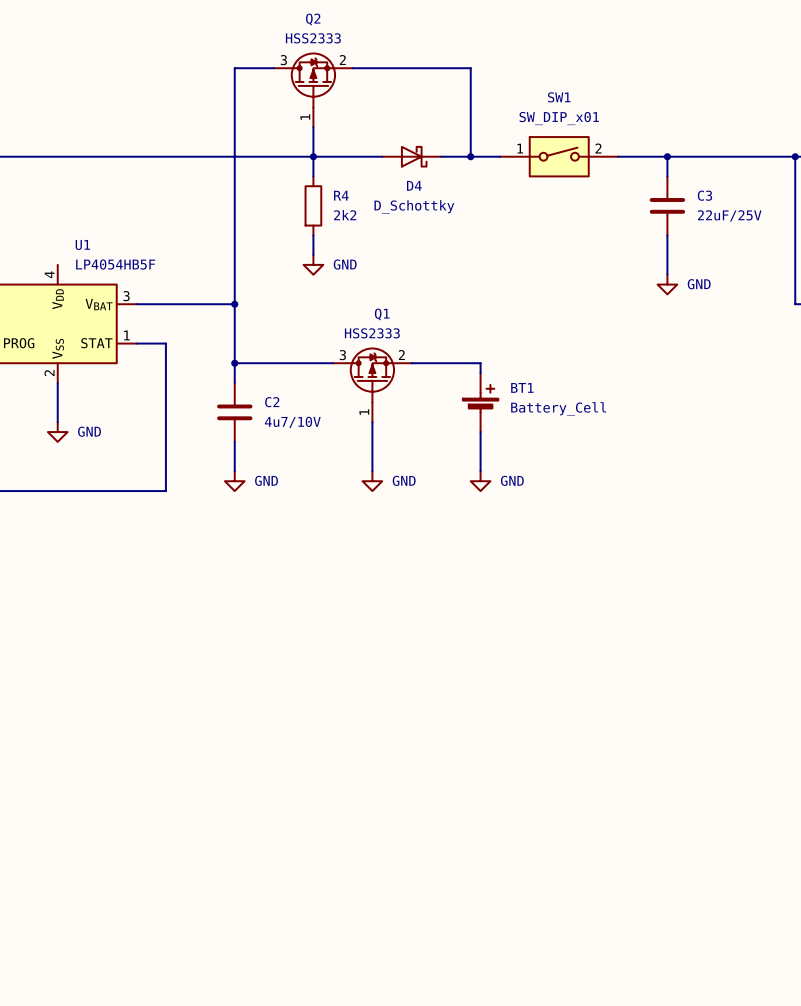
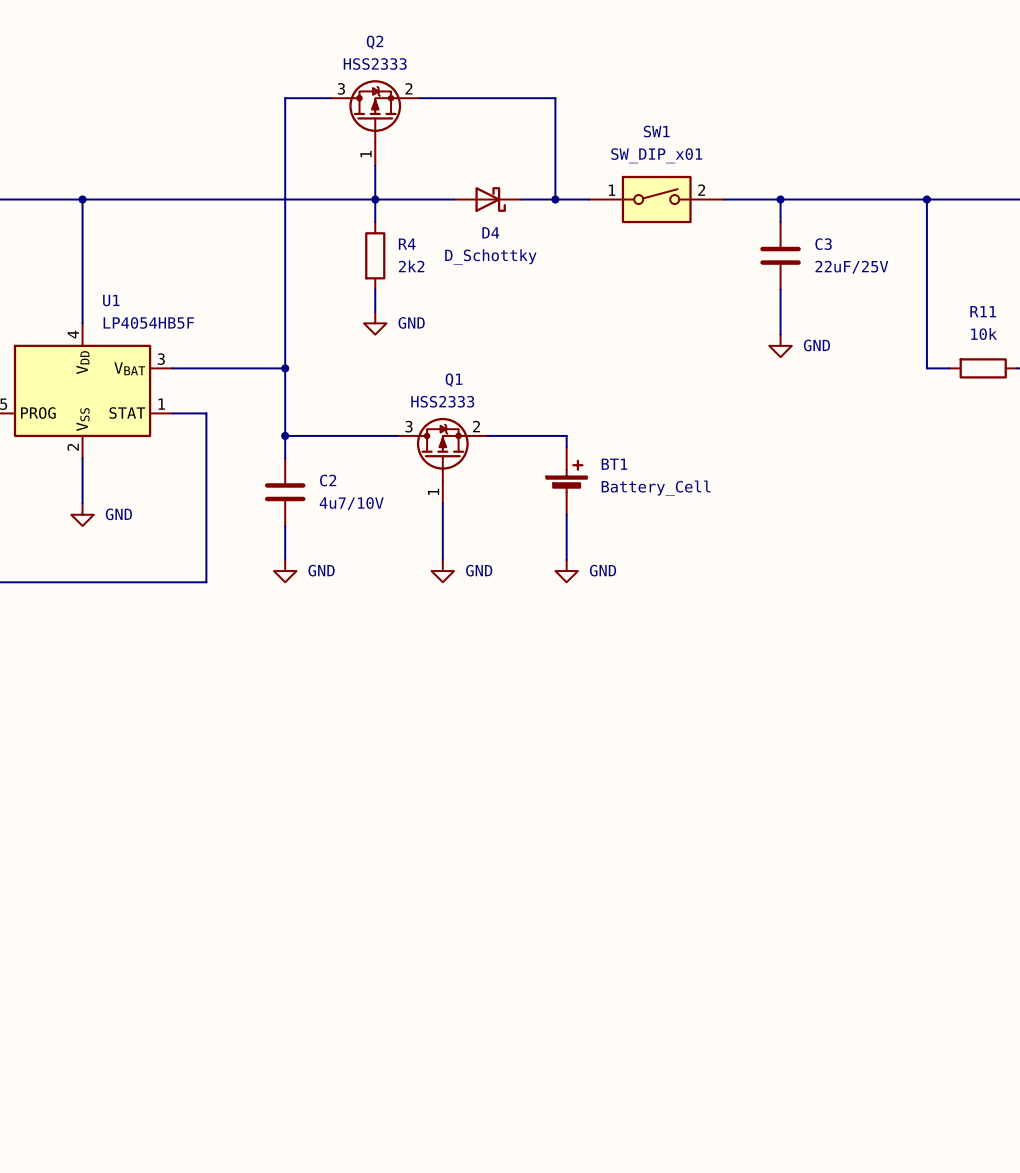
wire: none -> (82, 199) (82, 323)
junction: none -> (82, 199)

